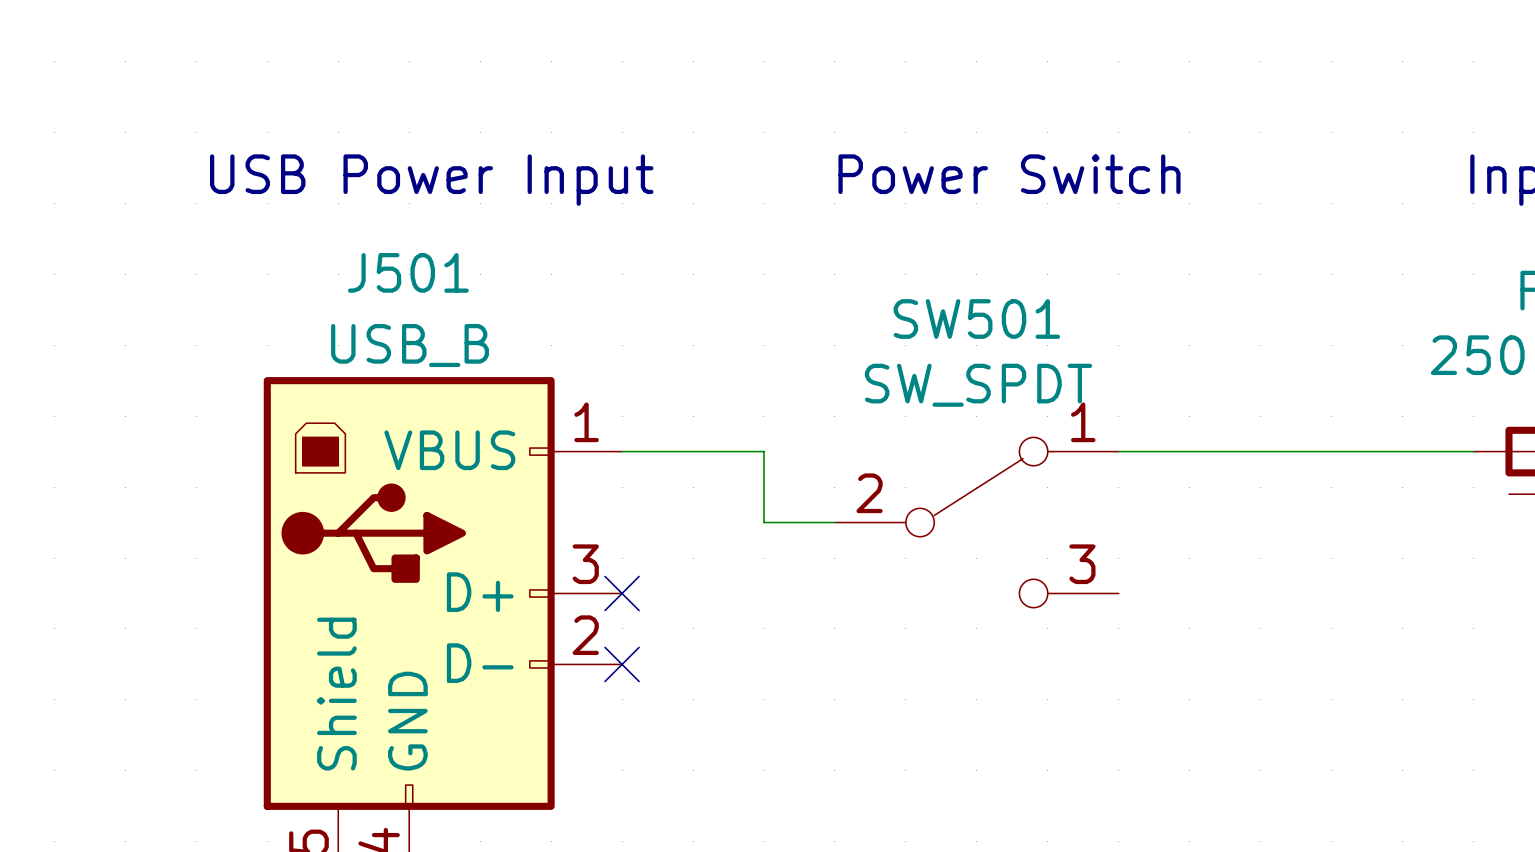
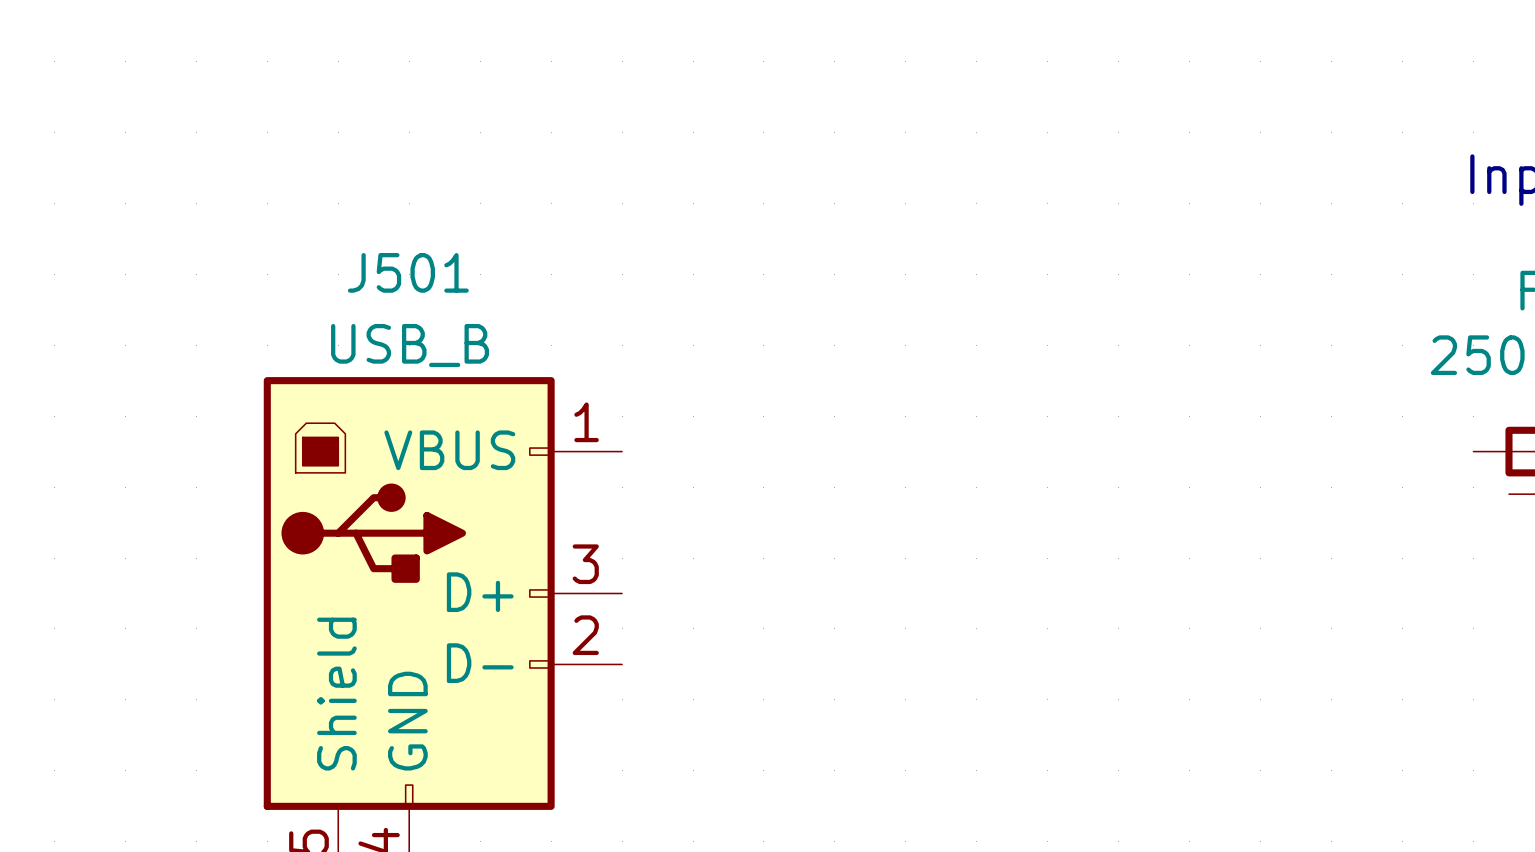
text: Power Switch (1009, 174) -> none
text: USB Power Input (431, 180) -> none
wire: (622, 451) (763, 451) (763, 522) (834, 522) -> none
wire: (1118, 451) (1473, 451) -> none
SW501: SW_SPDT (976, 522) -> none
no-connect mark: (622, 593) -> none
no-connect mark: (622, 664) -> none

